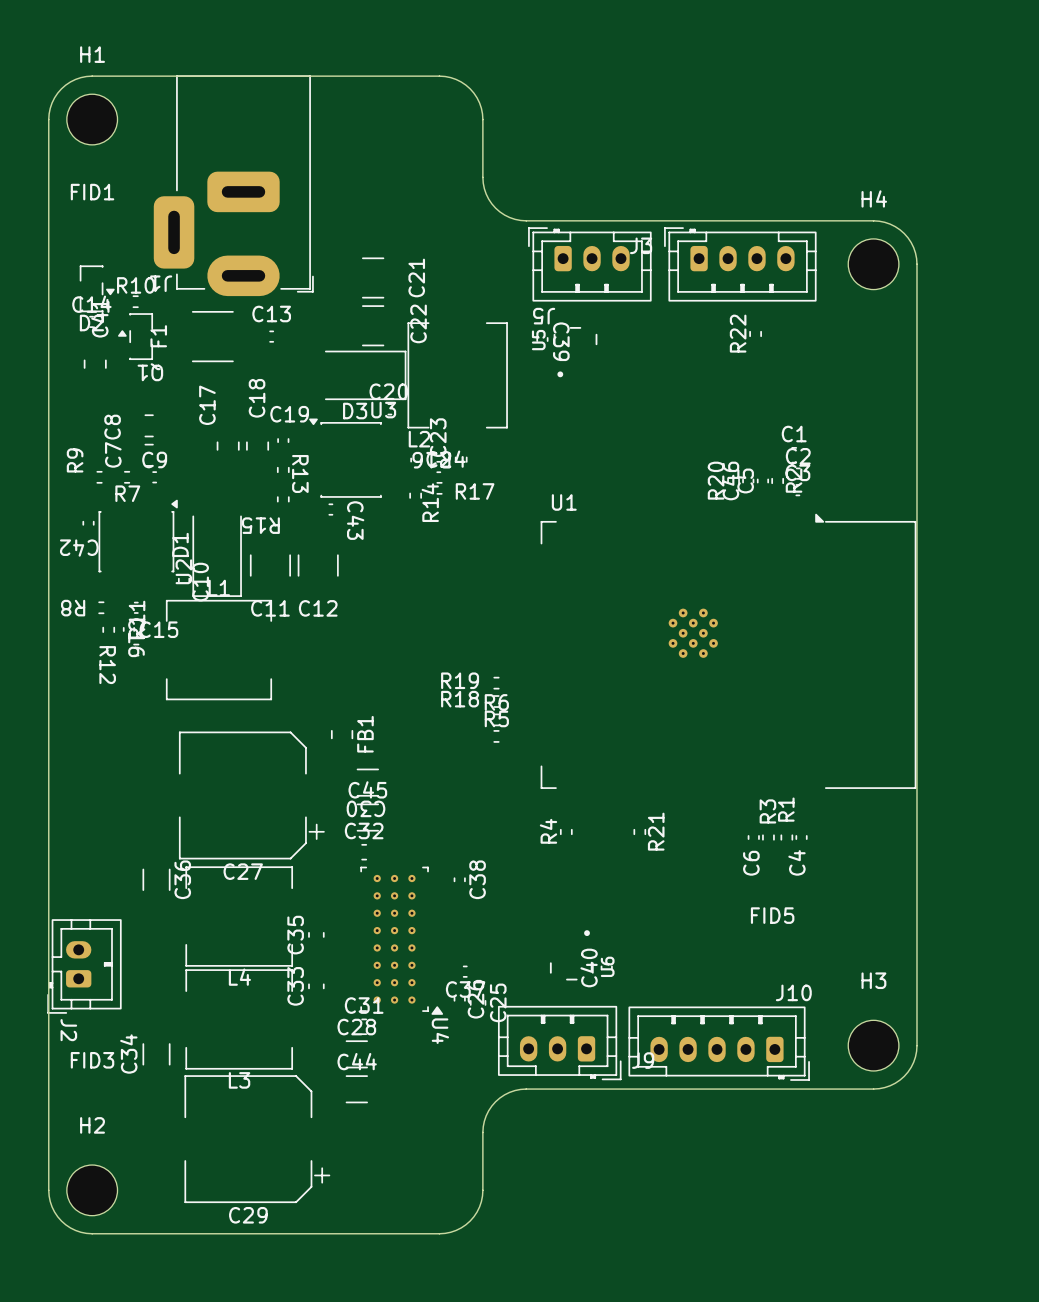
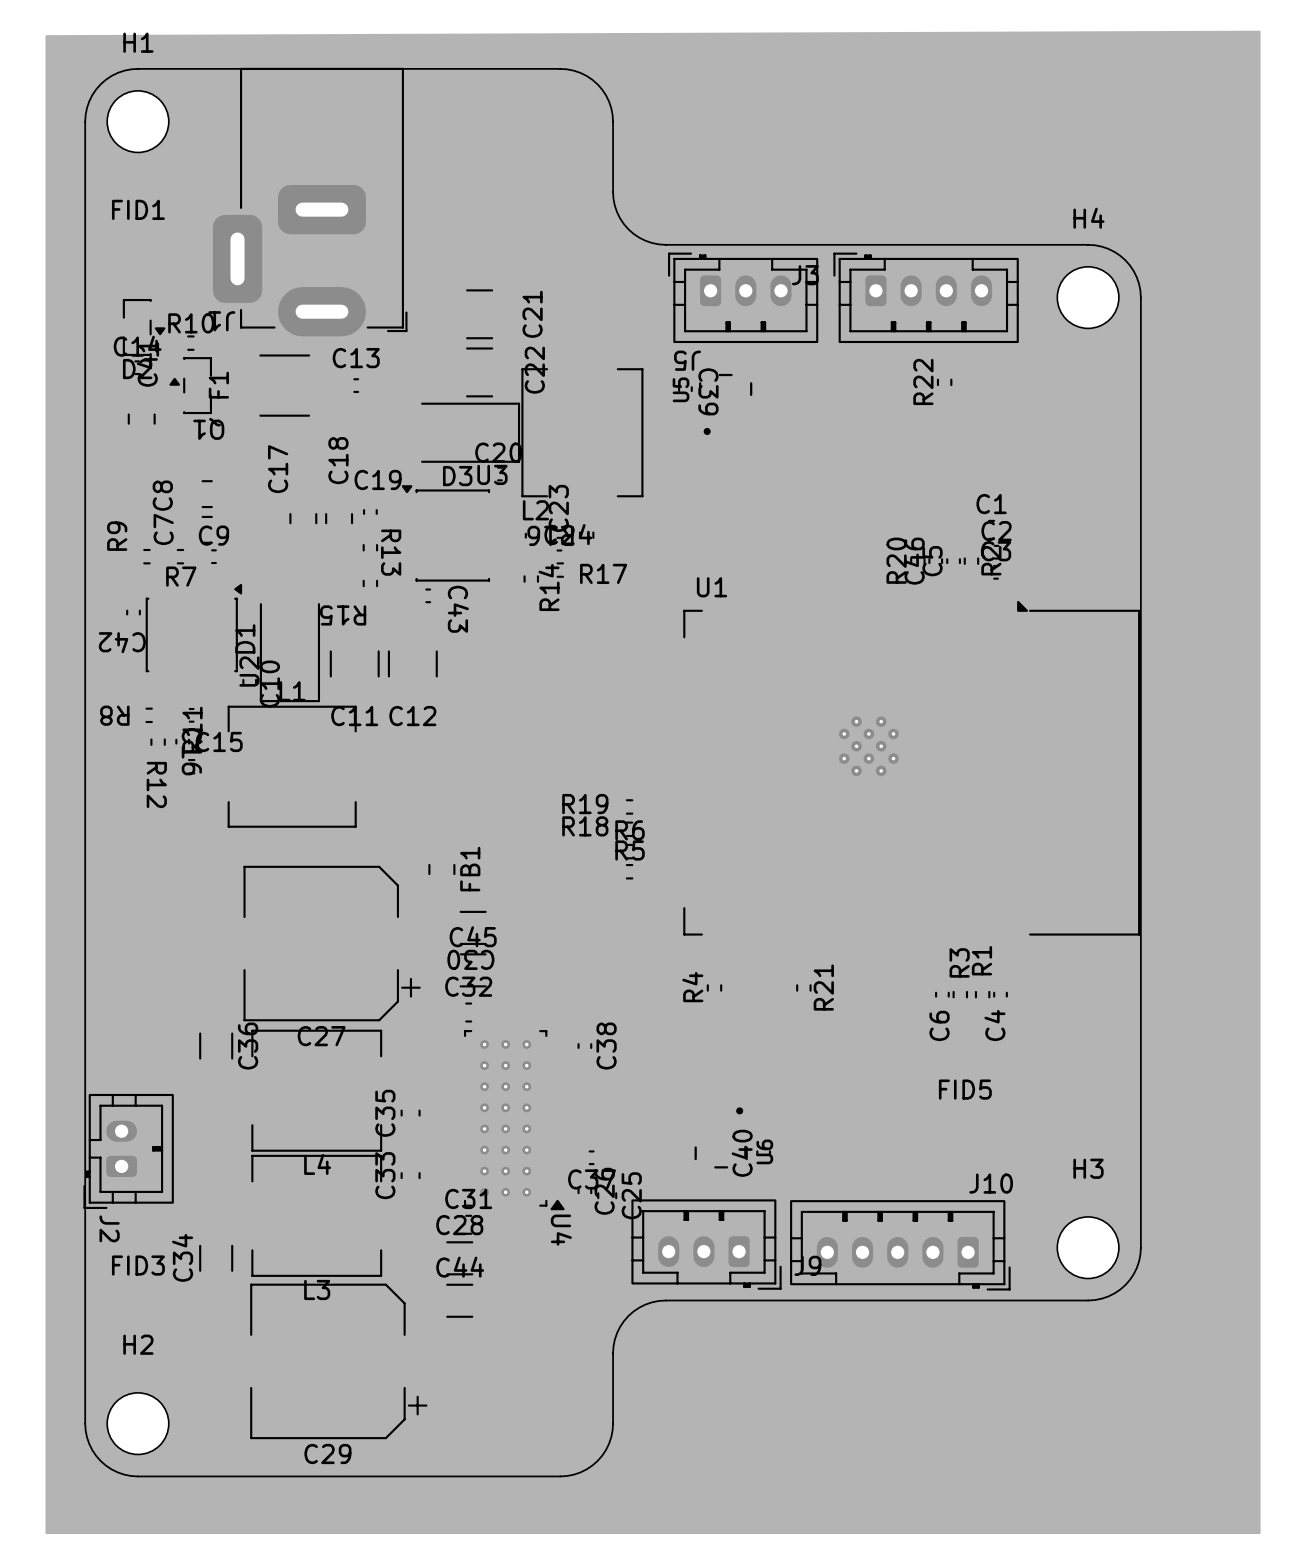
drawing: none -> [45, 30, 1261, 1535]

